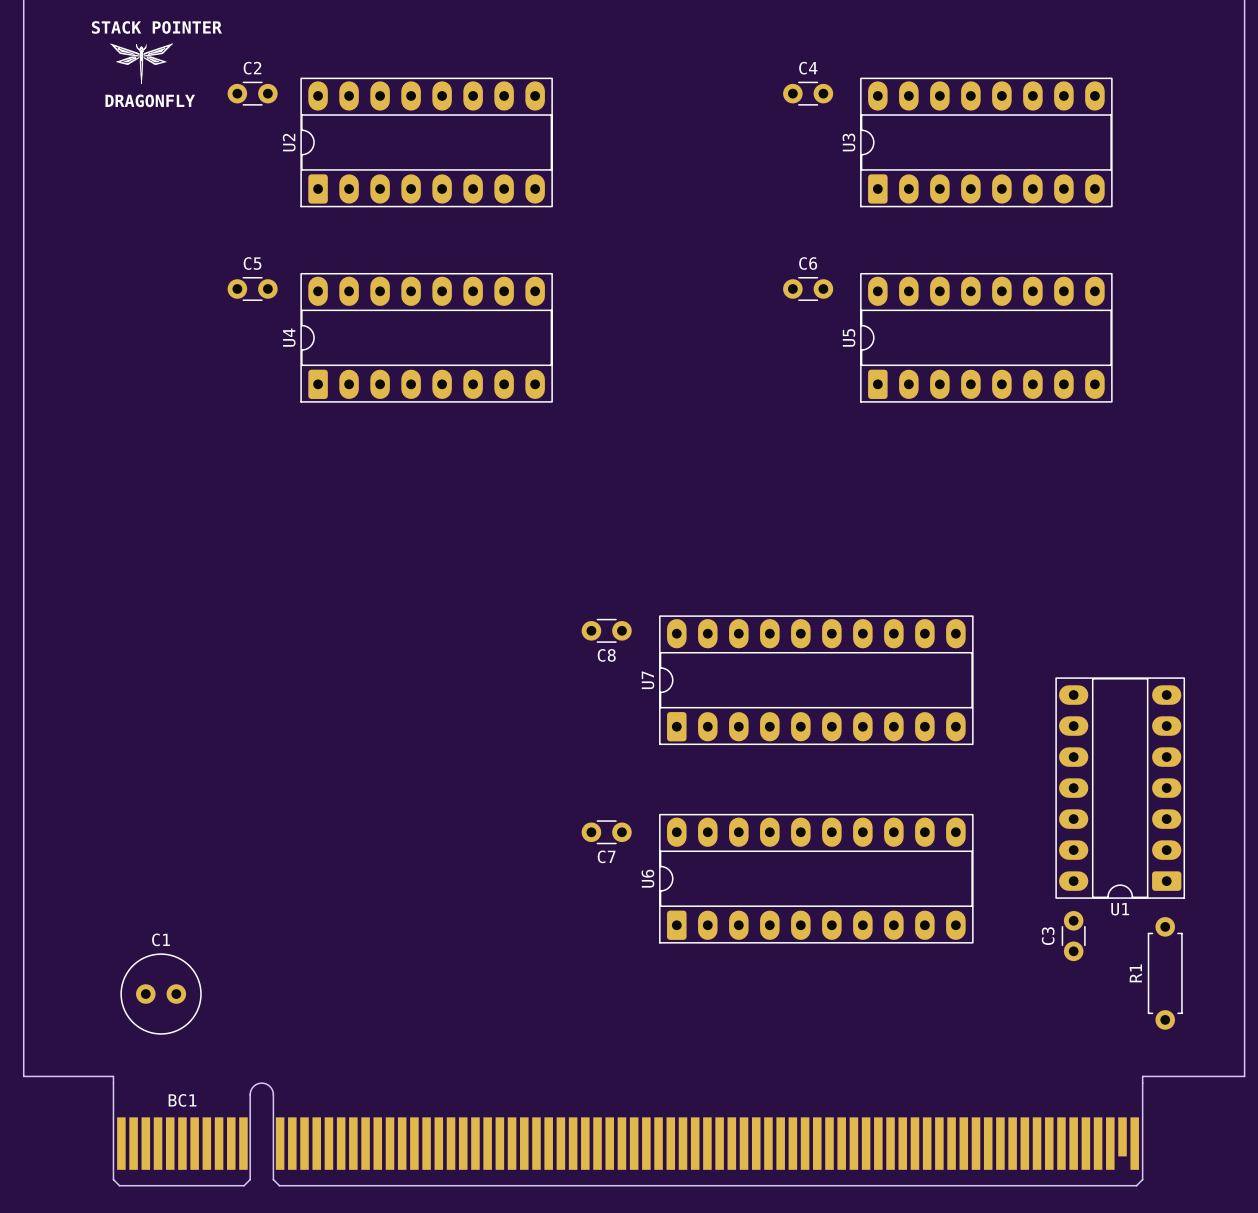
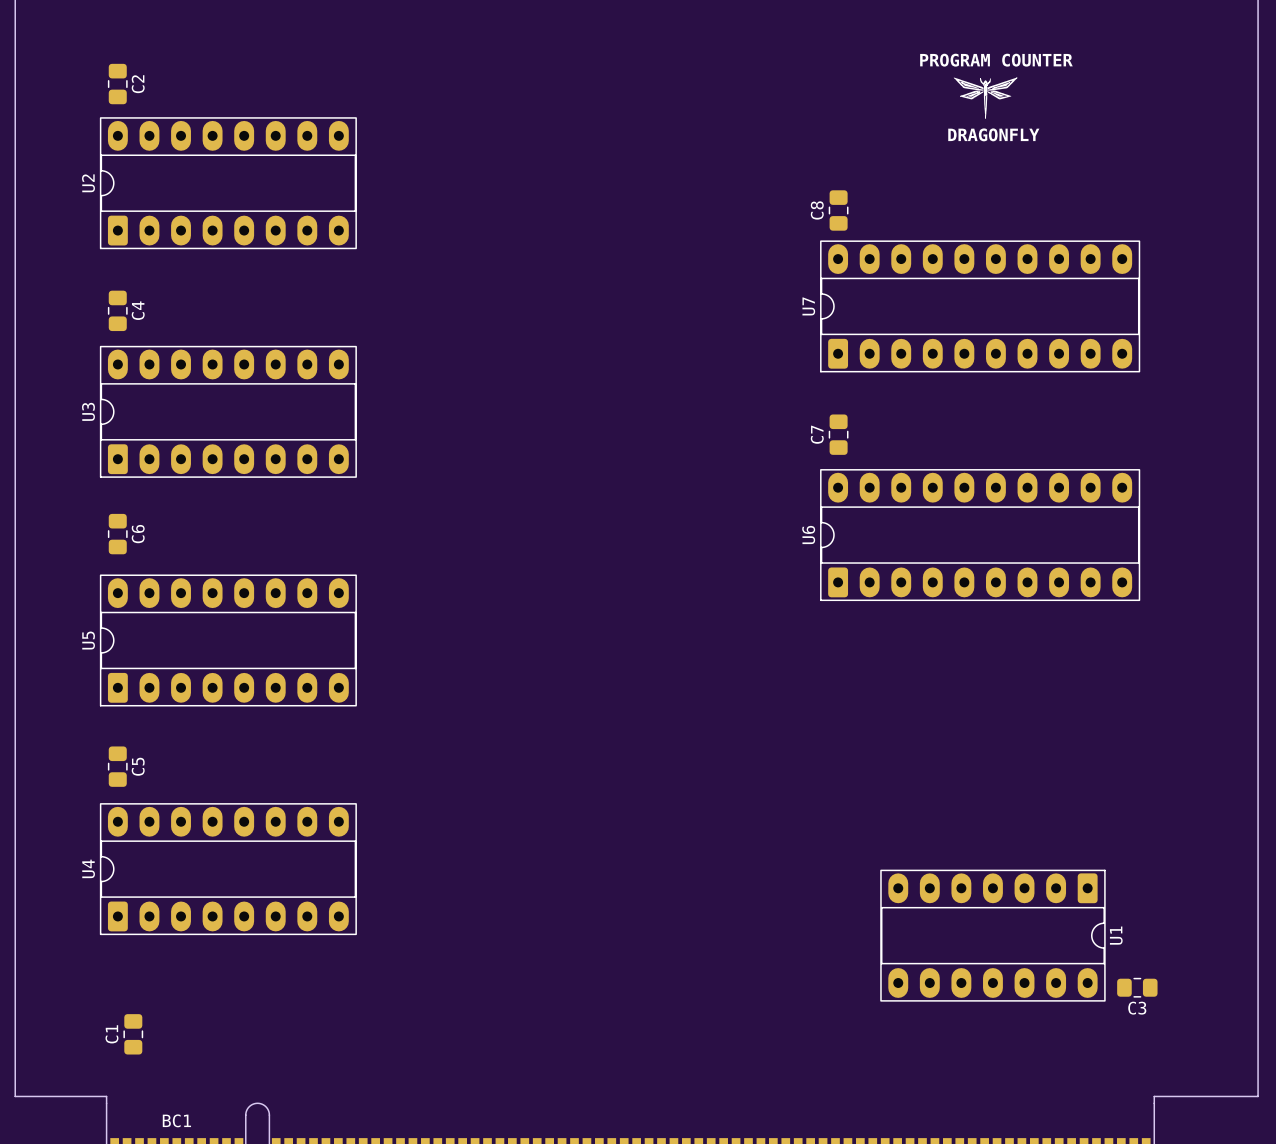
text: STACK POINTER (156, 27) -> none
drawing: [110, 43, 173, 85] -> none
text: none -> PROGRAM COUNTER (996, 60)
C2 name position: C2 (252, 68) -> C2 (138, 84)
C4 name position: C4 (808, 68) -> C4 (138, 310)
drawing: none -> [953, 77, 1018, 119]
C2 footprint: [227, 81, 278, 106] -> [107, 63, 128, 105]
C4 footprint: [783, 81, 834, 106] -> [107, 290, 128, 332]
text: DRAGONFLY (150, 100) -> none
text: none -> DRAGONFLY (993, 134)
U2 position: (426, 142) -> (228, 183)
U3 position: (986, 142) -> (228, 411)
C5 name position: C5 (252, 263) -> C5 (138, 766)
C6 name position: C6 (808, 263) -> C6 (138, 534)
C5 footprint: [227, 277, 278, 301] -> [107, 746, 128, 787]
C6 footprint: [783, 277, 834, 301] -> [107, 513, 128, 555]
U4 position: (426, 337) -> (228, 869)
U5 position: (986, 337) -> (228, 640)
C8 footprint: [581, 618, 632, 643] -> [828, 190, 849, 231]
C8 name position: C8 (606, 655) -> C8 (817, 210)
U7 position: (816, 680) -> (980, 306)
U1 rotation: 0° (1120, 788) -> 90° counterclockwise (992, 935)
U1 position: (1120, 788) -> (992, 935)
C7 footprint: [581, 820, 632, 845] -> [828, 414, 849, 455]
C7 name position: C7 (606, 856) -> C7 (817, 434)
U6 position: (816, 878) -> (980, 535)
C3 footprint: [1061, 911, 1086, 962] -> [1117, 977, 1158, 998]
C3 name position: C3 (1048, 936) -> C3 (1137, 1008)
C1 name position: C1 (161, 939) -> C1 (111, 1034)
C1 footprint: [120, 953, 202, 1035] -> [123, 1014, 144, 1055]
R1: (1165, 973) -> none

